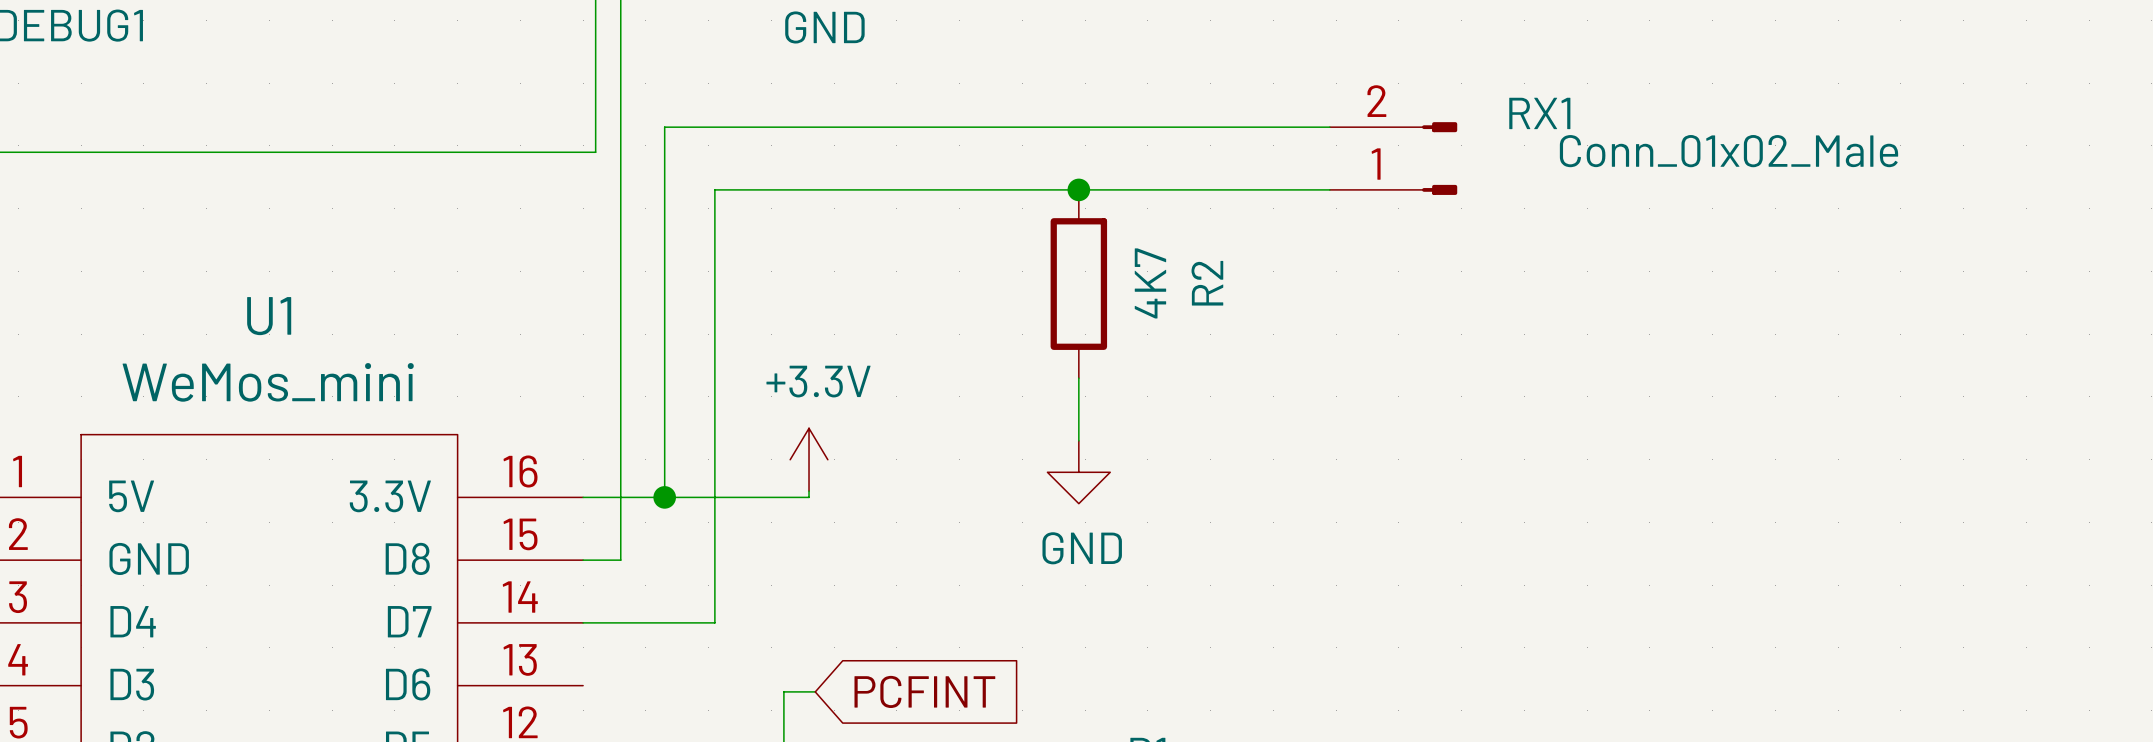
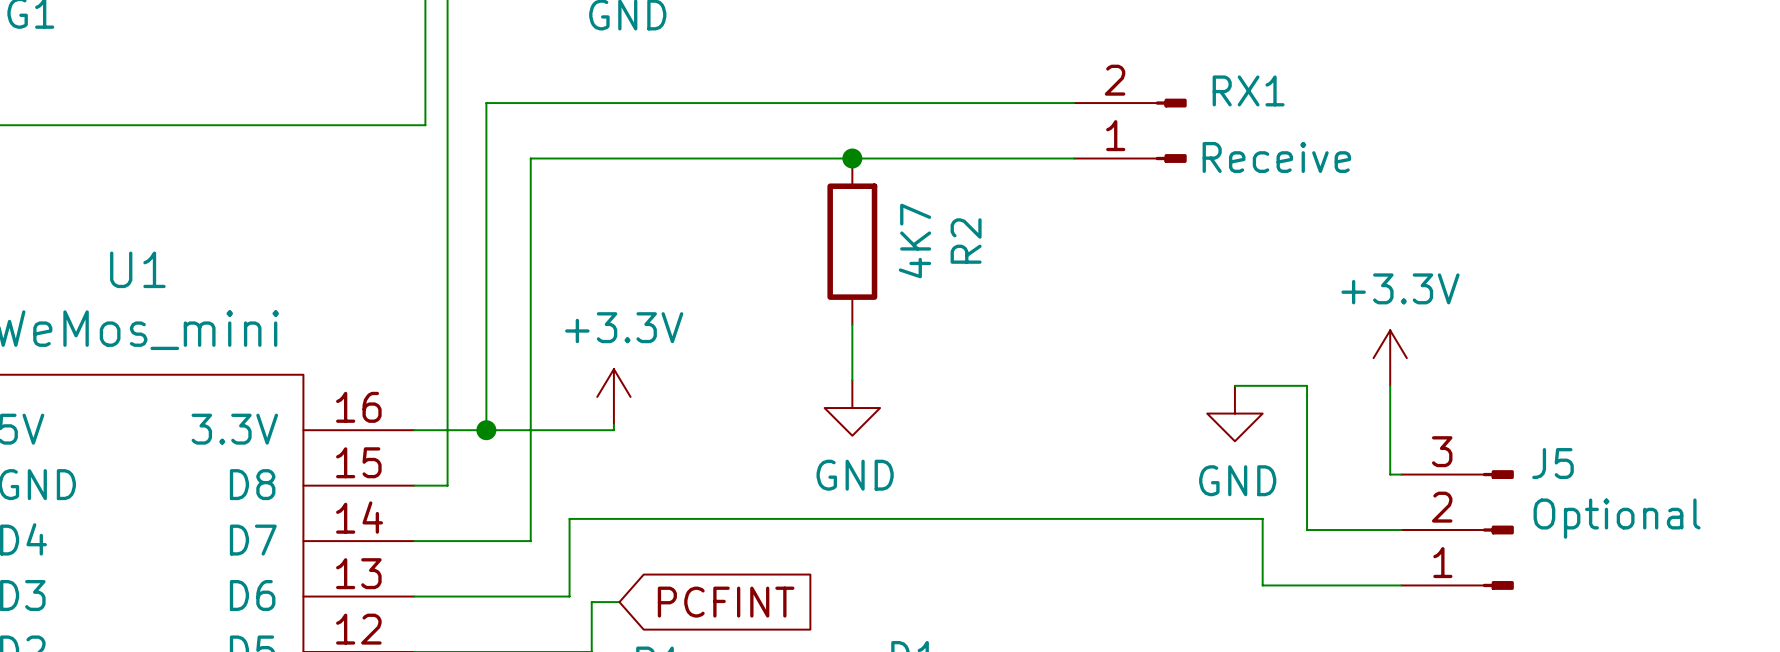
RX1 value: Conn_01x02_Male (1729, 151) -> Receive (1276, 157)
power symbol: none -> +3.3V (1390, 358)
wire: none -> (1234, 385) (1307, 385) (1307, 530) (1401, 530)
wire: none -> (1390, 385) (1390, 474) (1401, 474)
power symbol: none -> GND (1234, 413)
J5: none -> Optional (1457, 530)
wire: none -> (1401, 585) (1262, 585) (1262, 518) (569, 518) (569, 596) (414, 596)

